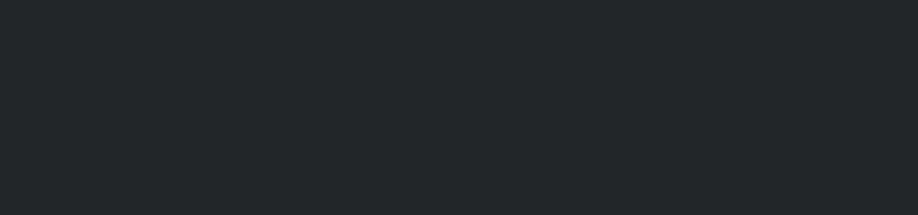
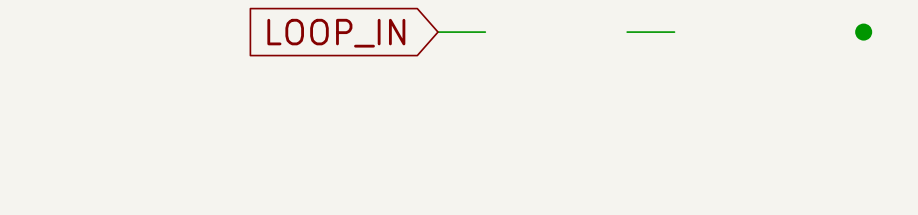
wire: none -> (438, 32) (485, 32)
wire: none -> (627, 32) (674, 32)
junction: none -> (863, 32)
global label: none -> LOOP_IN (336, 33)

